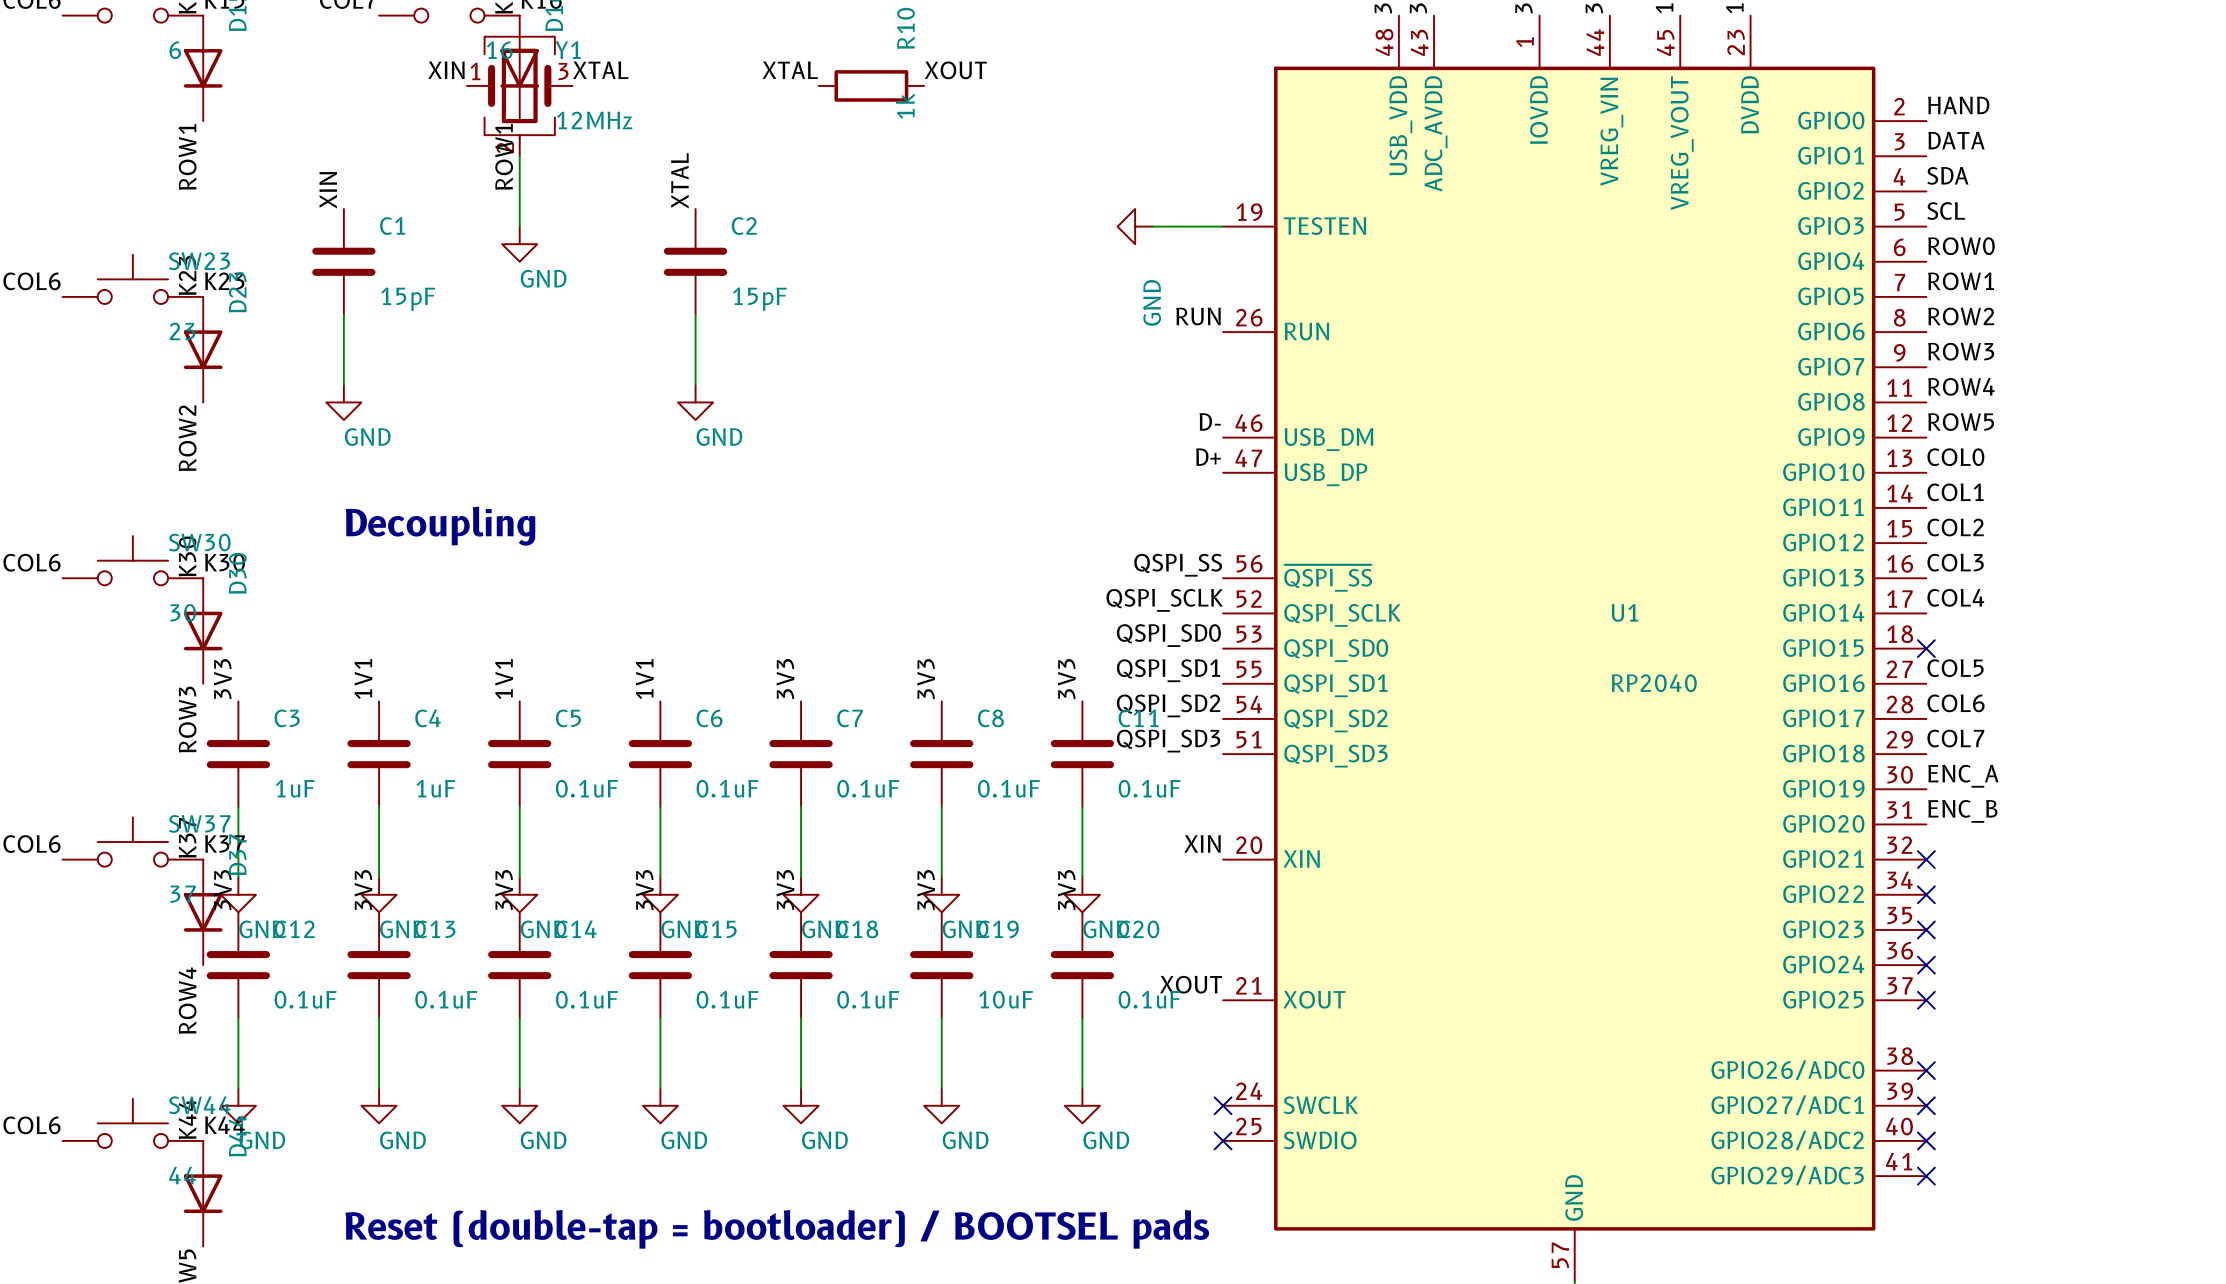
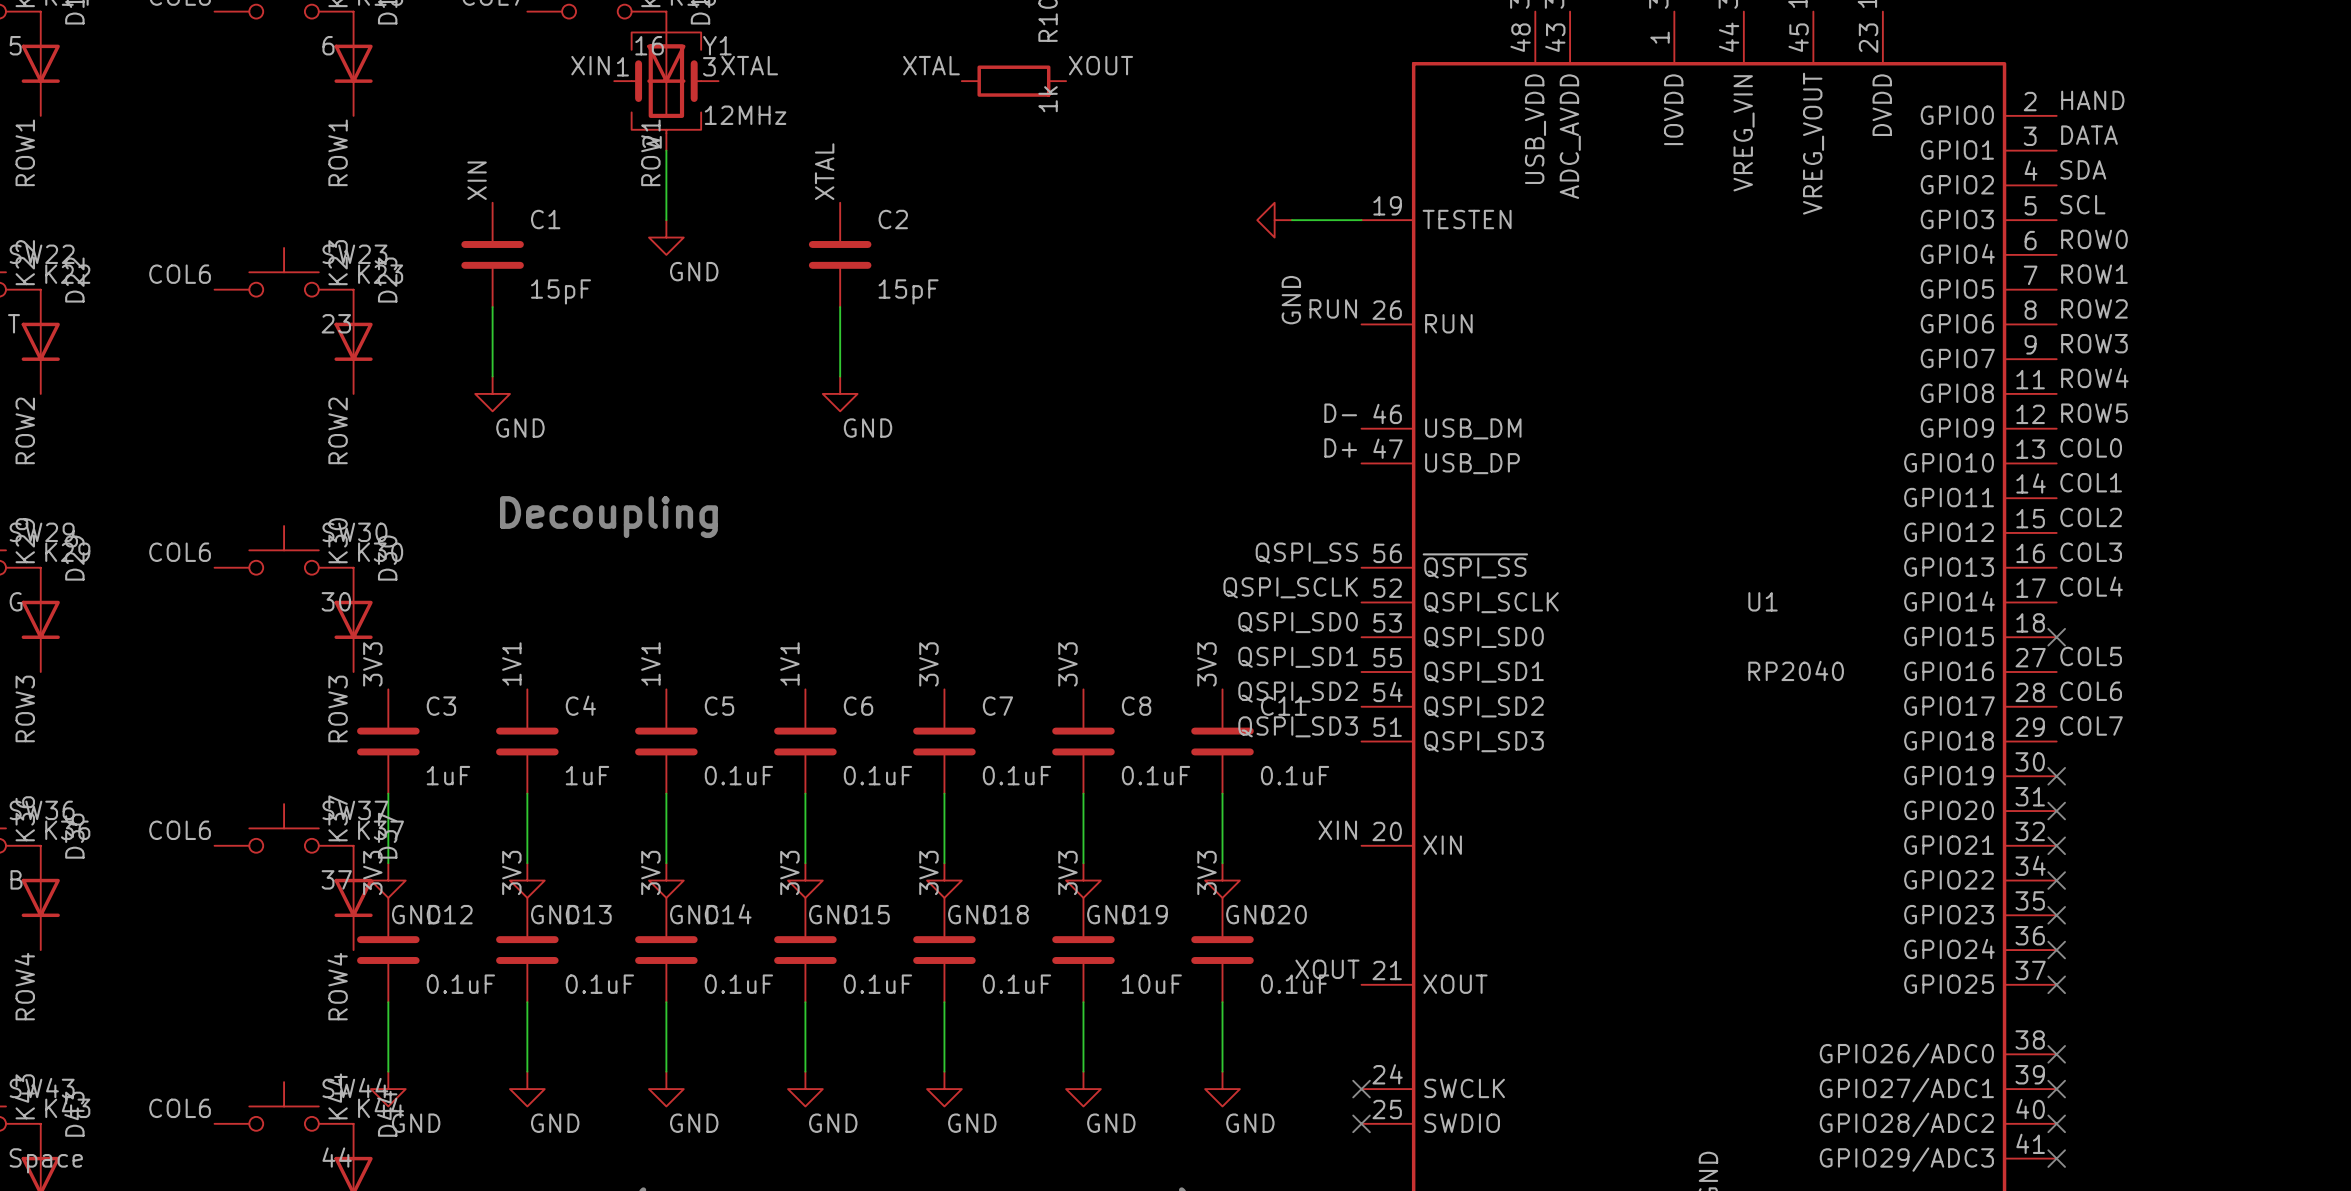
label: ENC_A (1963, 776) -> none
no-connect mark: none -> (2056, 776)
label: ENC_B (1962, 811) -> none
no-connect mark: none -> (2056, 811)

